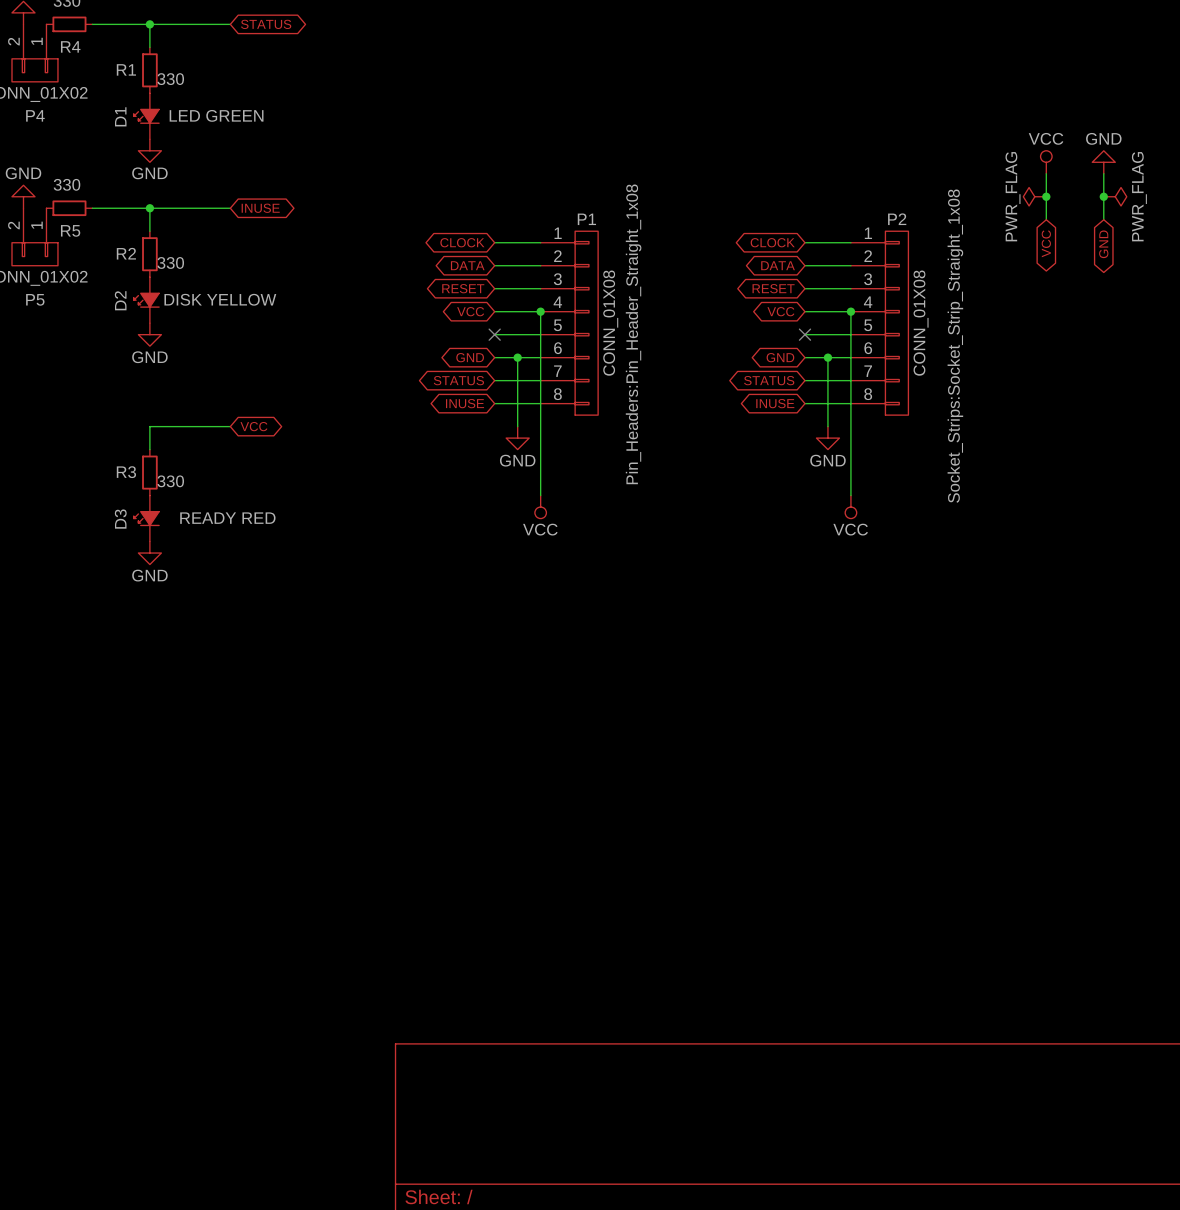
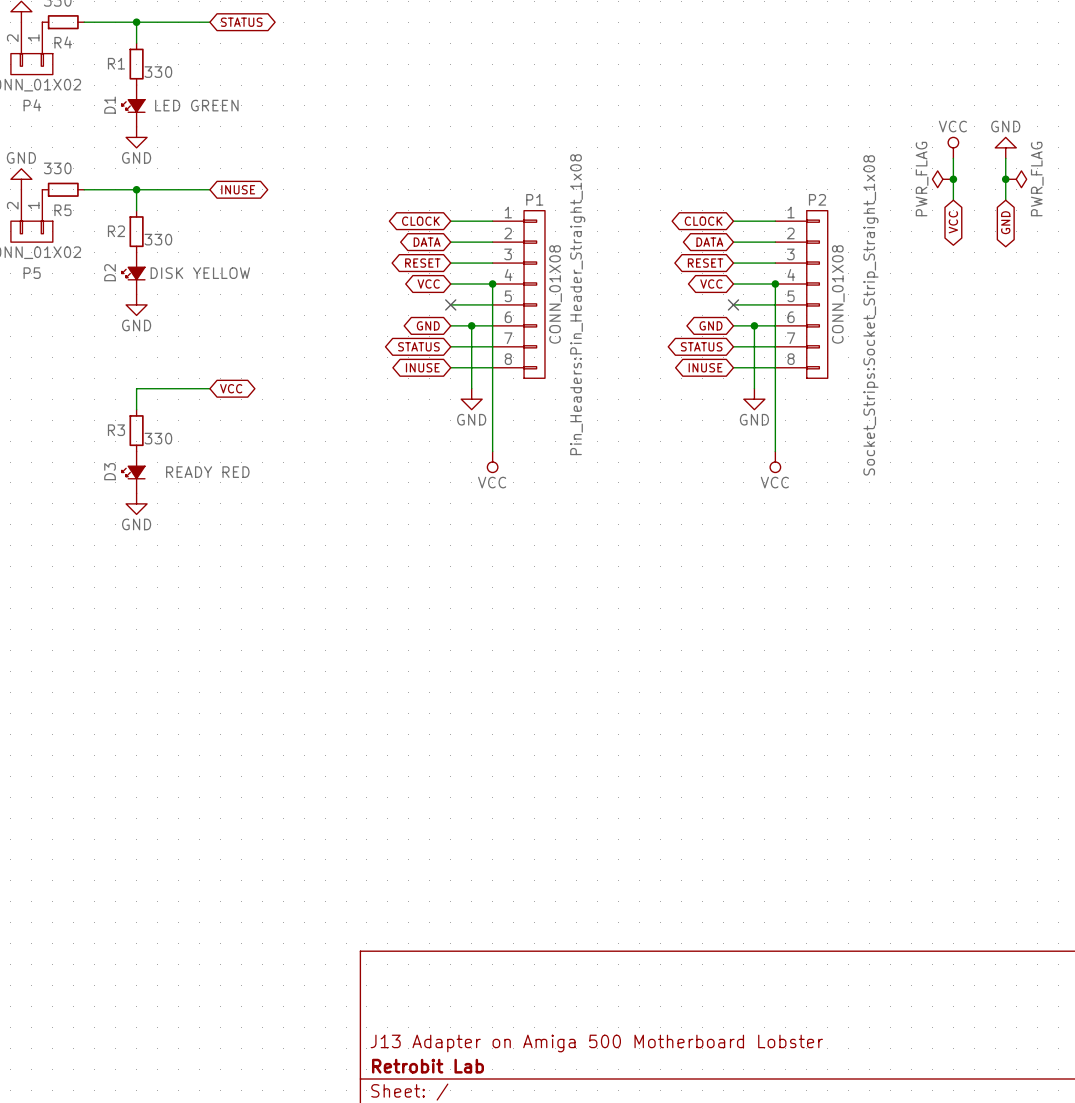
title block: none -> J13 Adapter on Amiga 500 Motherboard Lobster (596, 1043)
title block: none -> Retrobit Lab (427, 1066)

